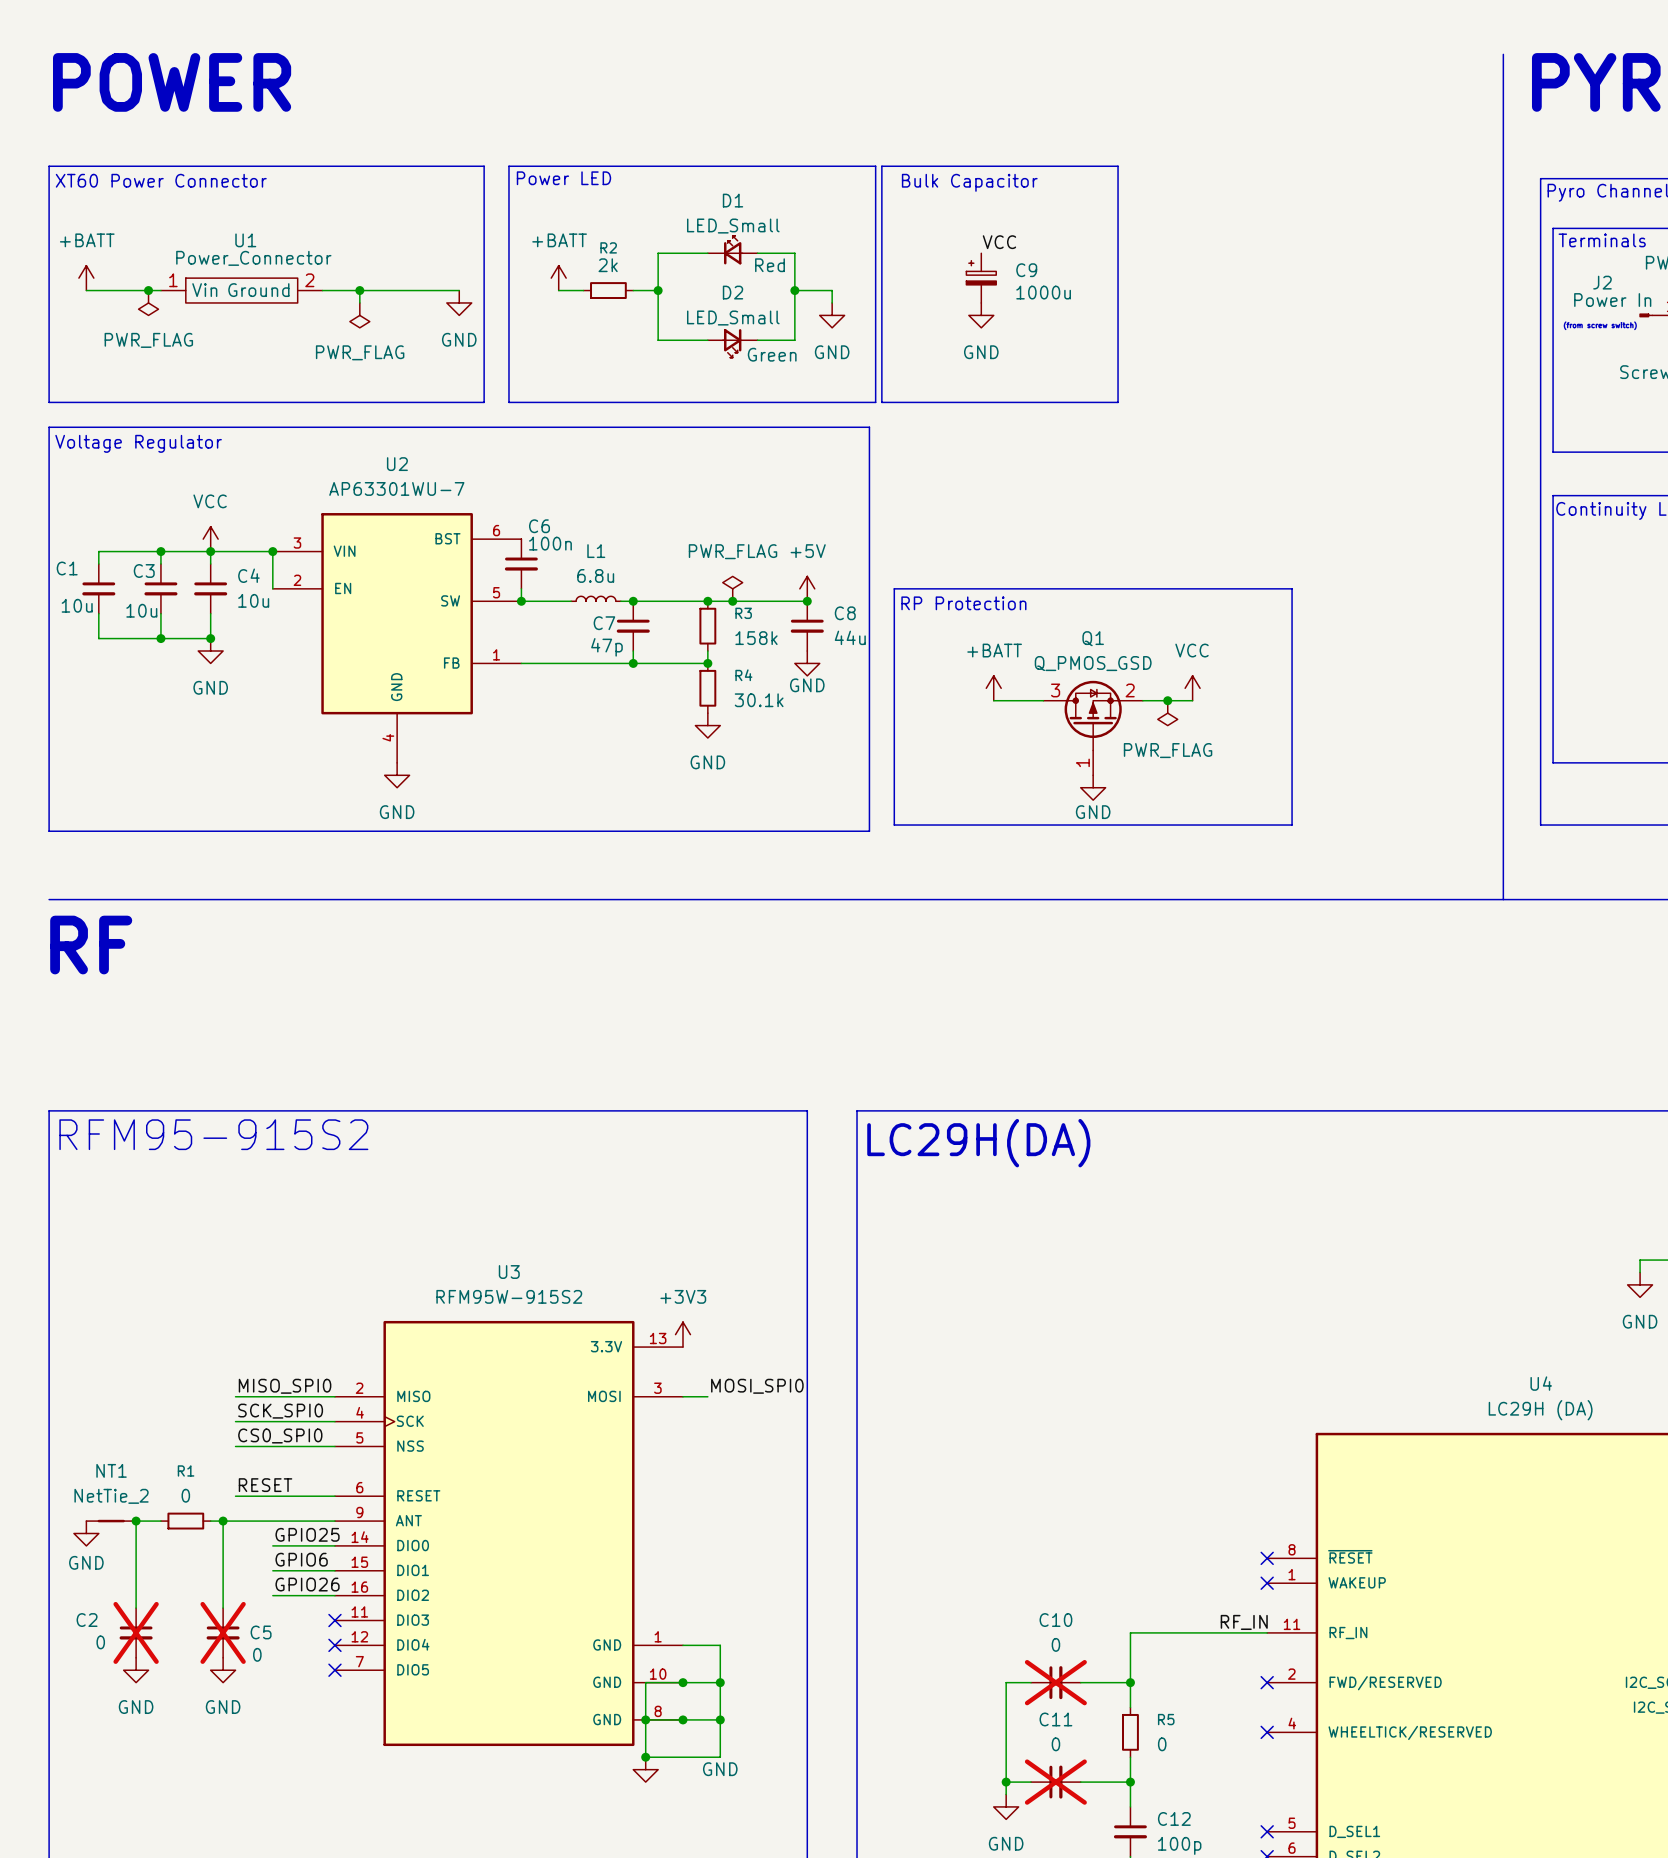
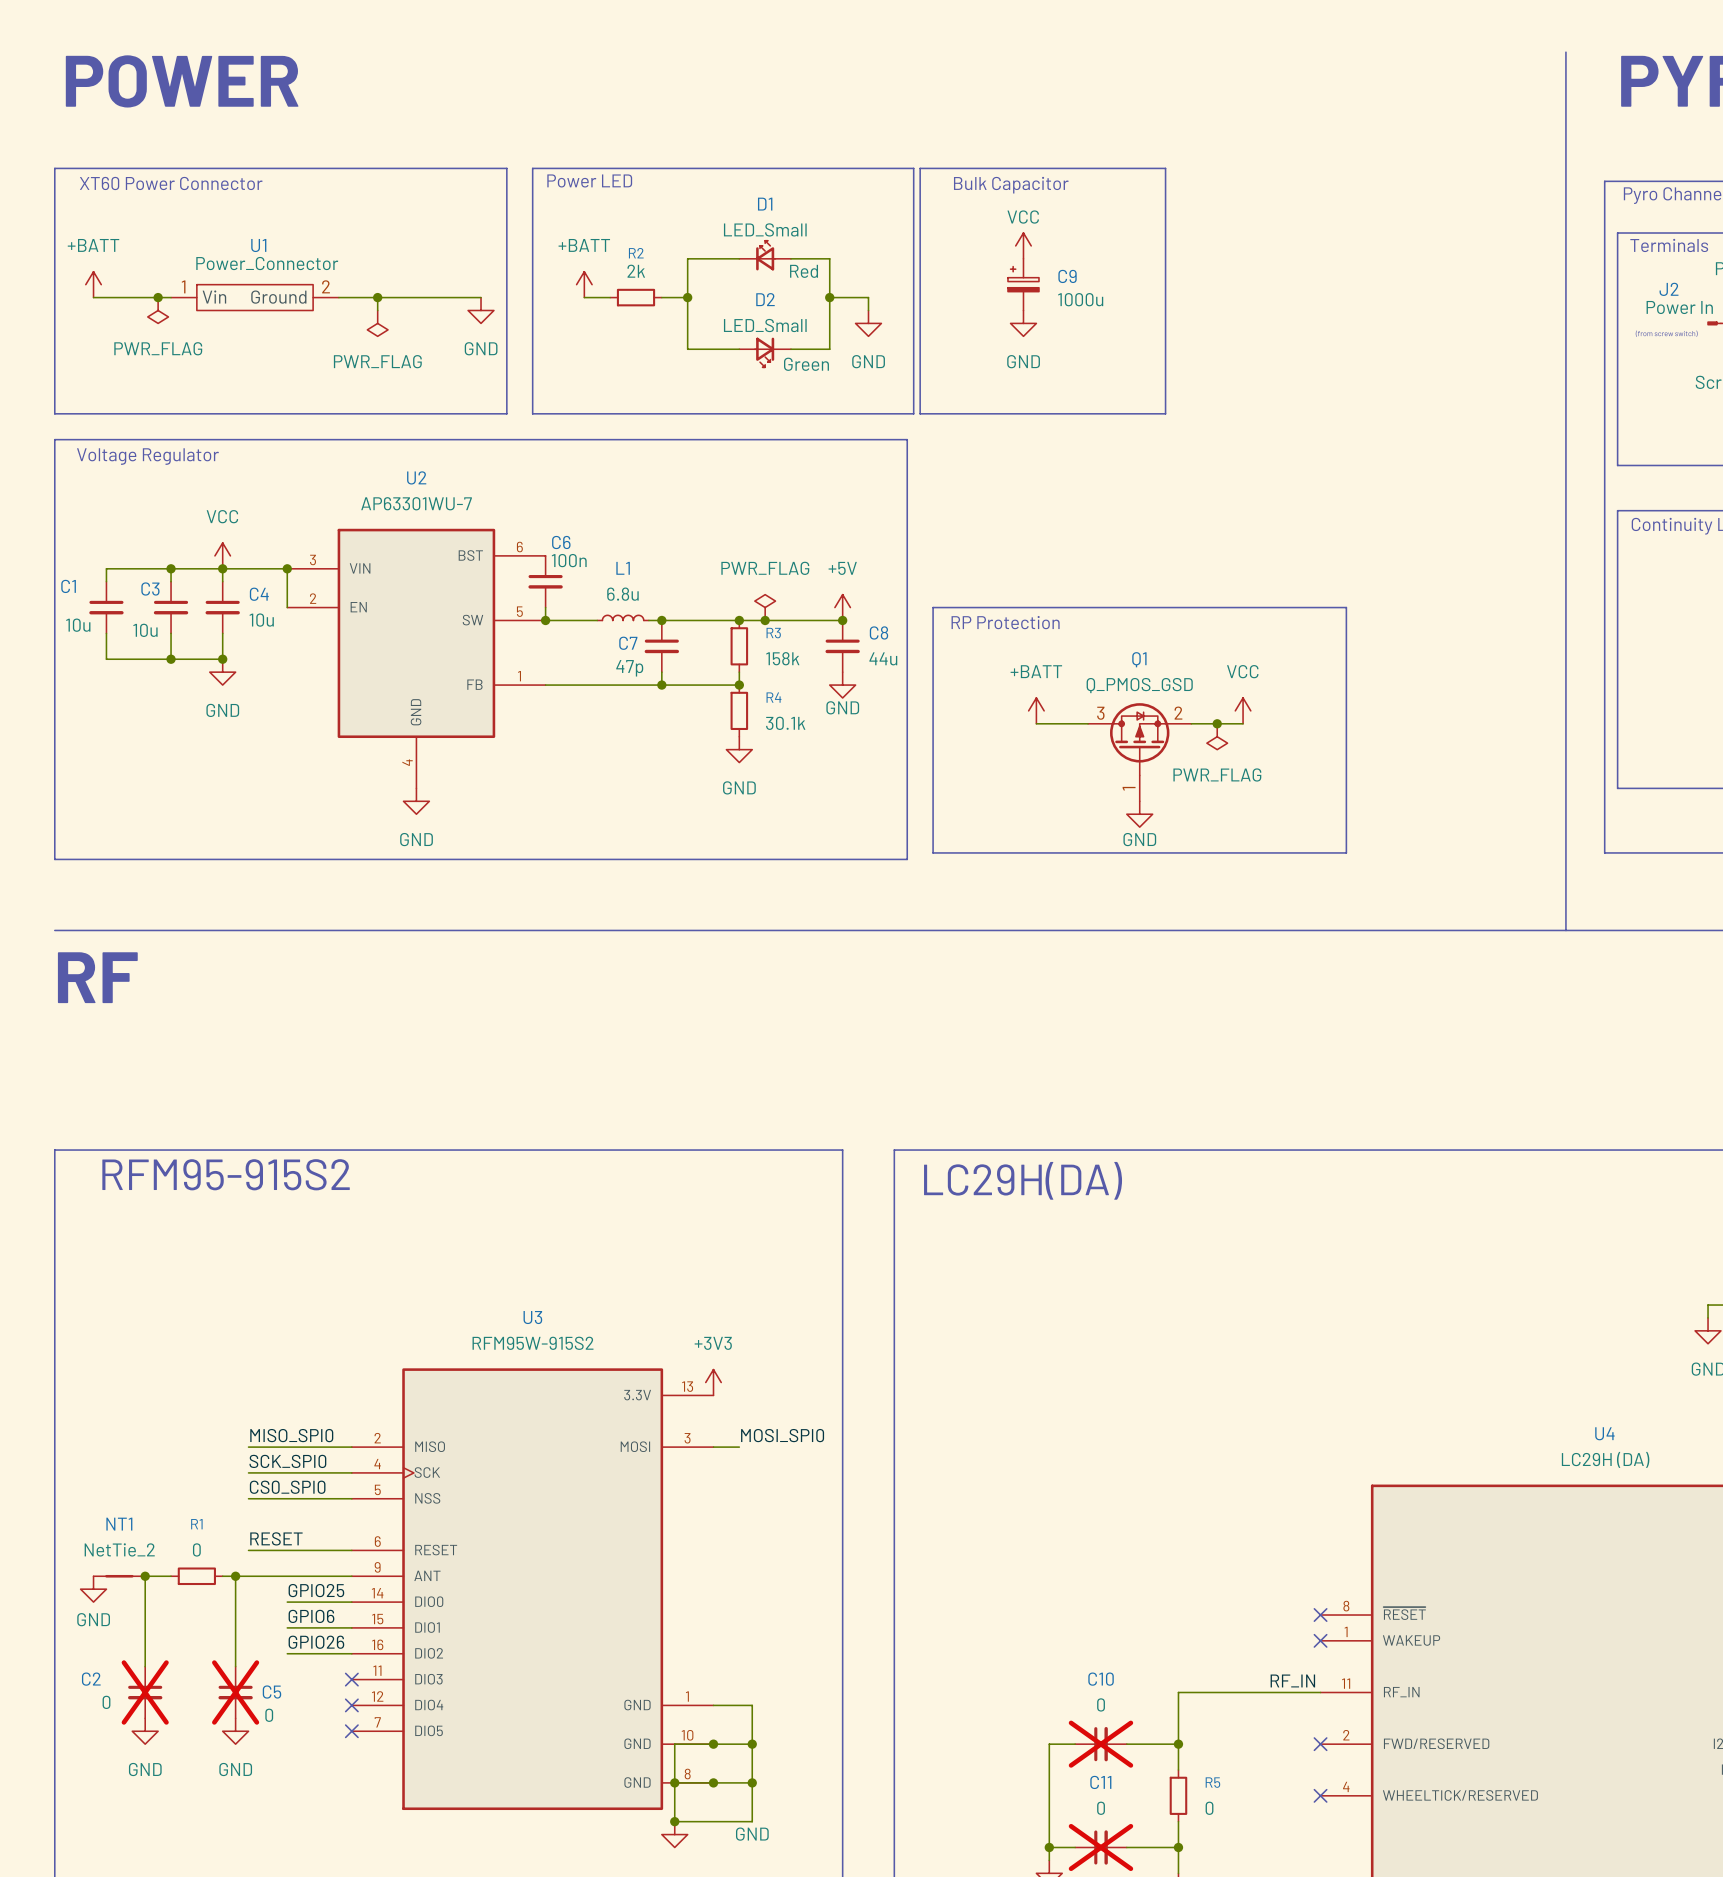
power symbol: none -> VCC (1023, 245)
label: VCC (999, 242) -> none

